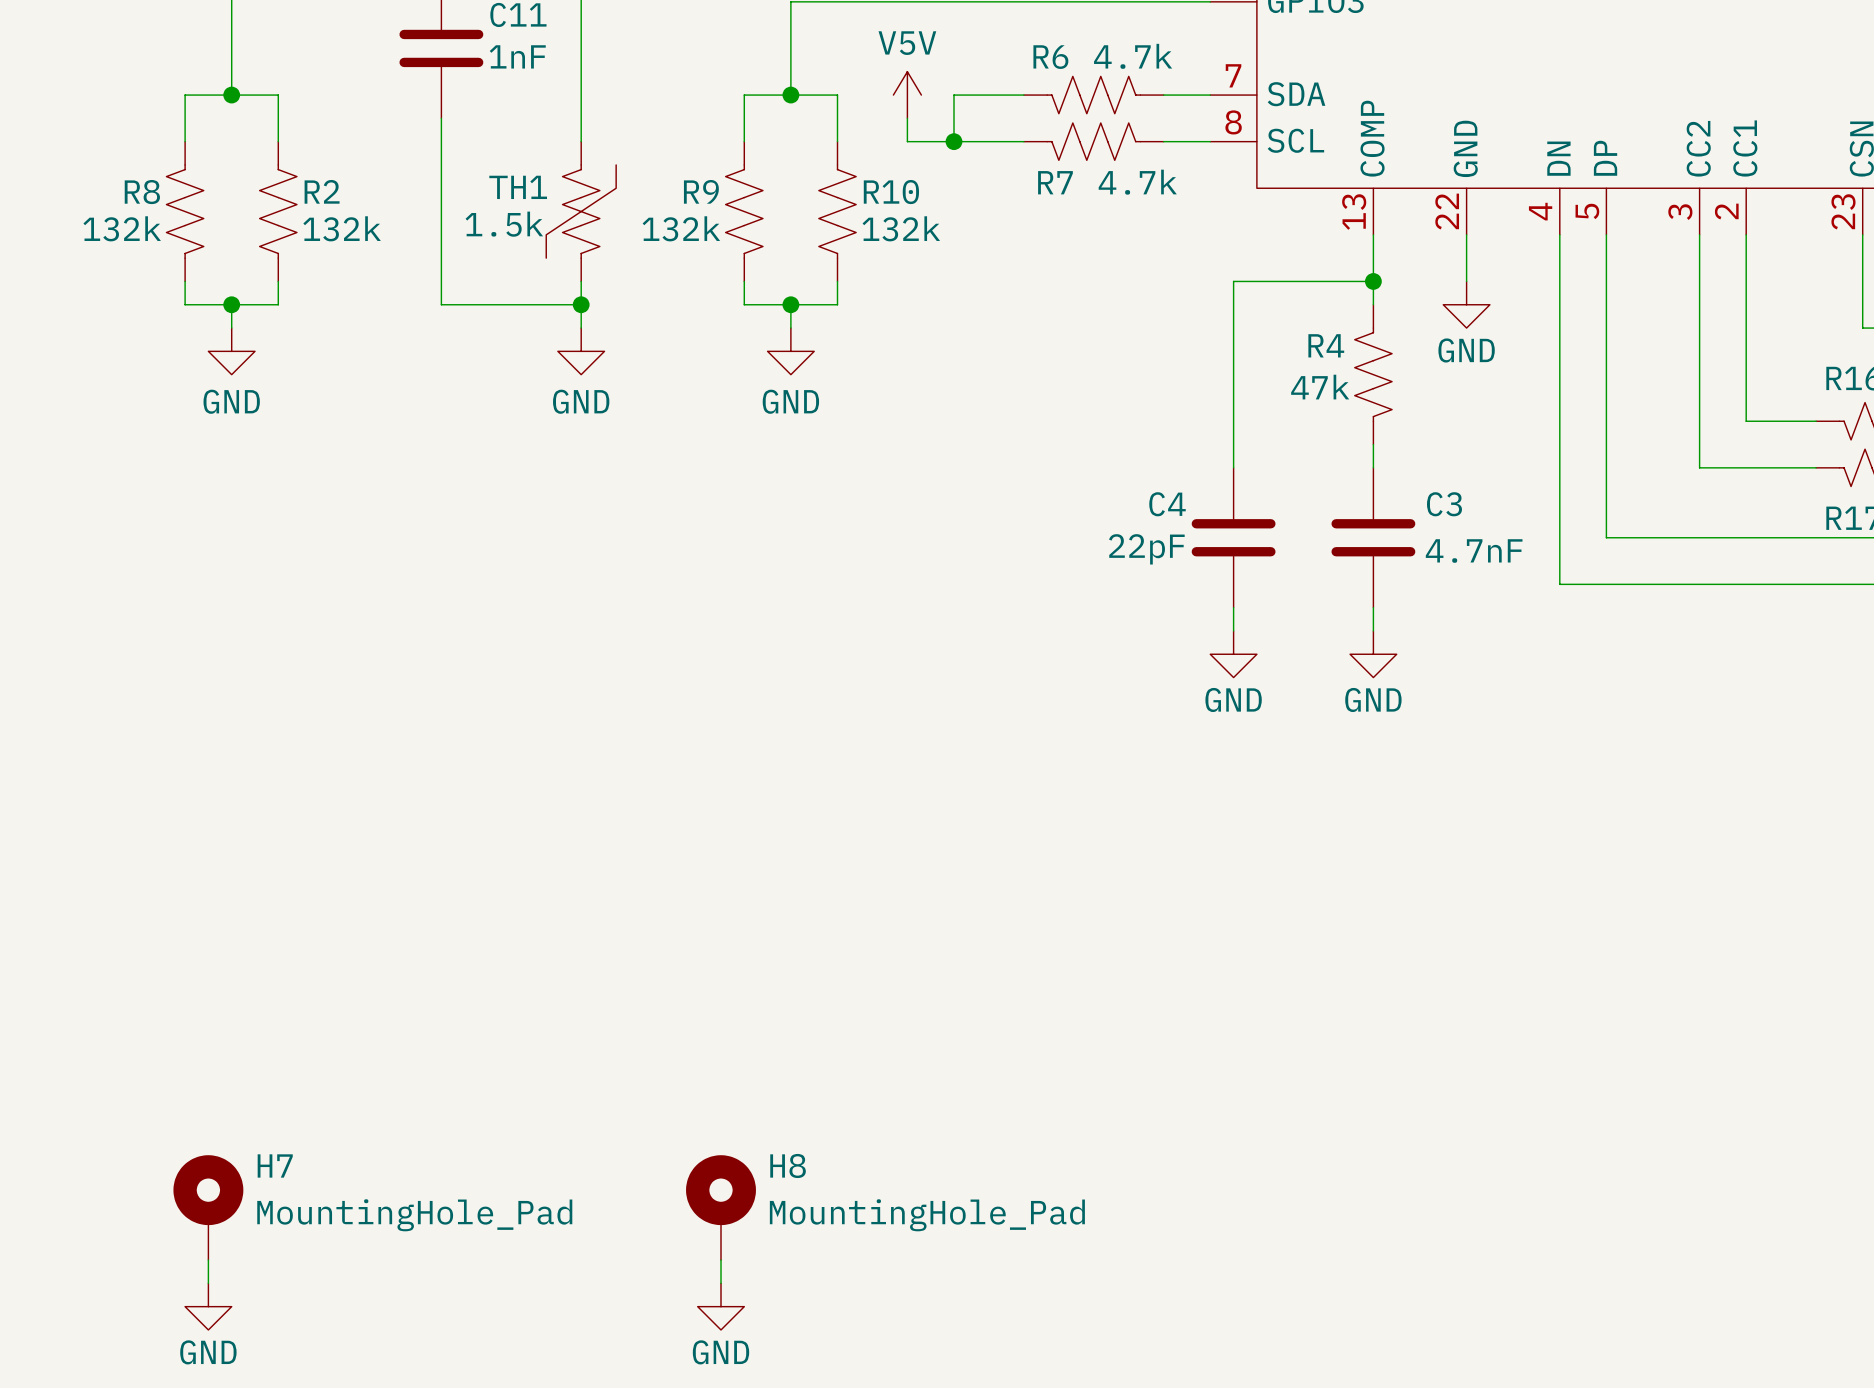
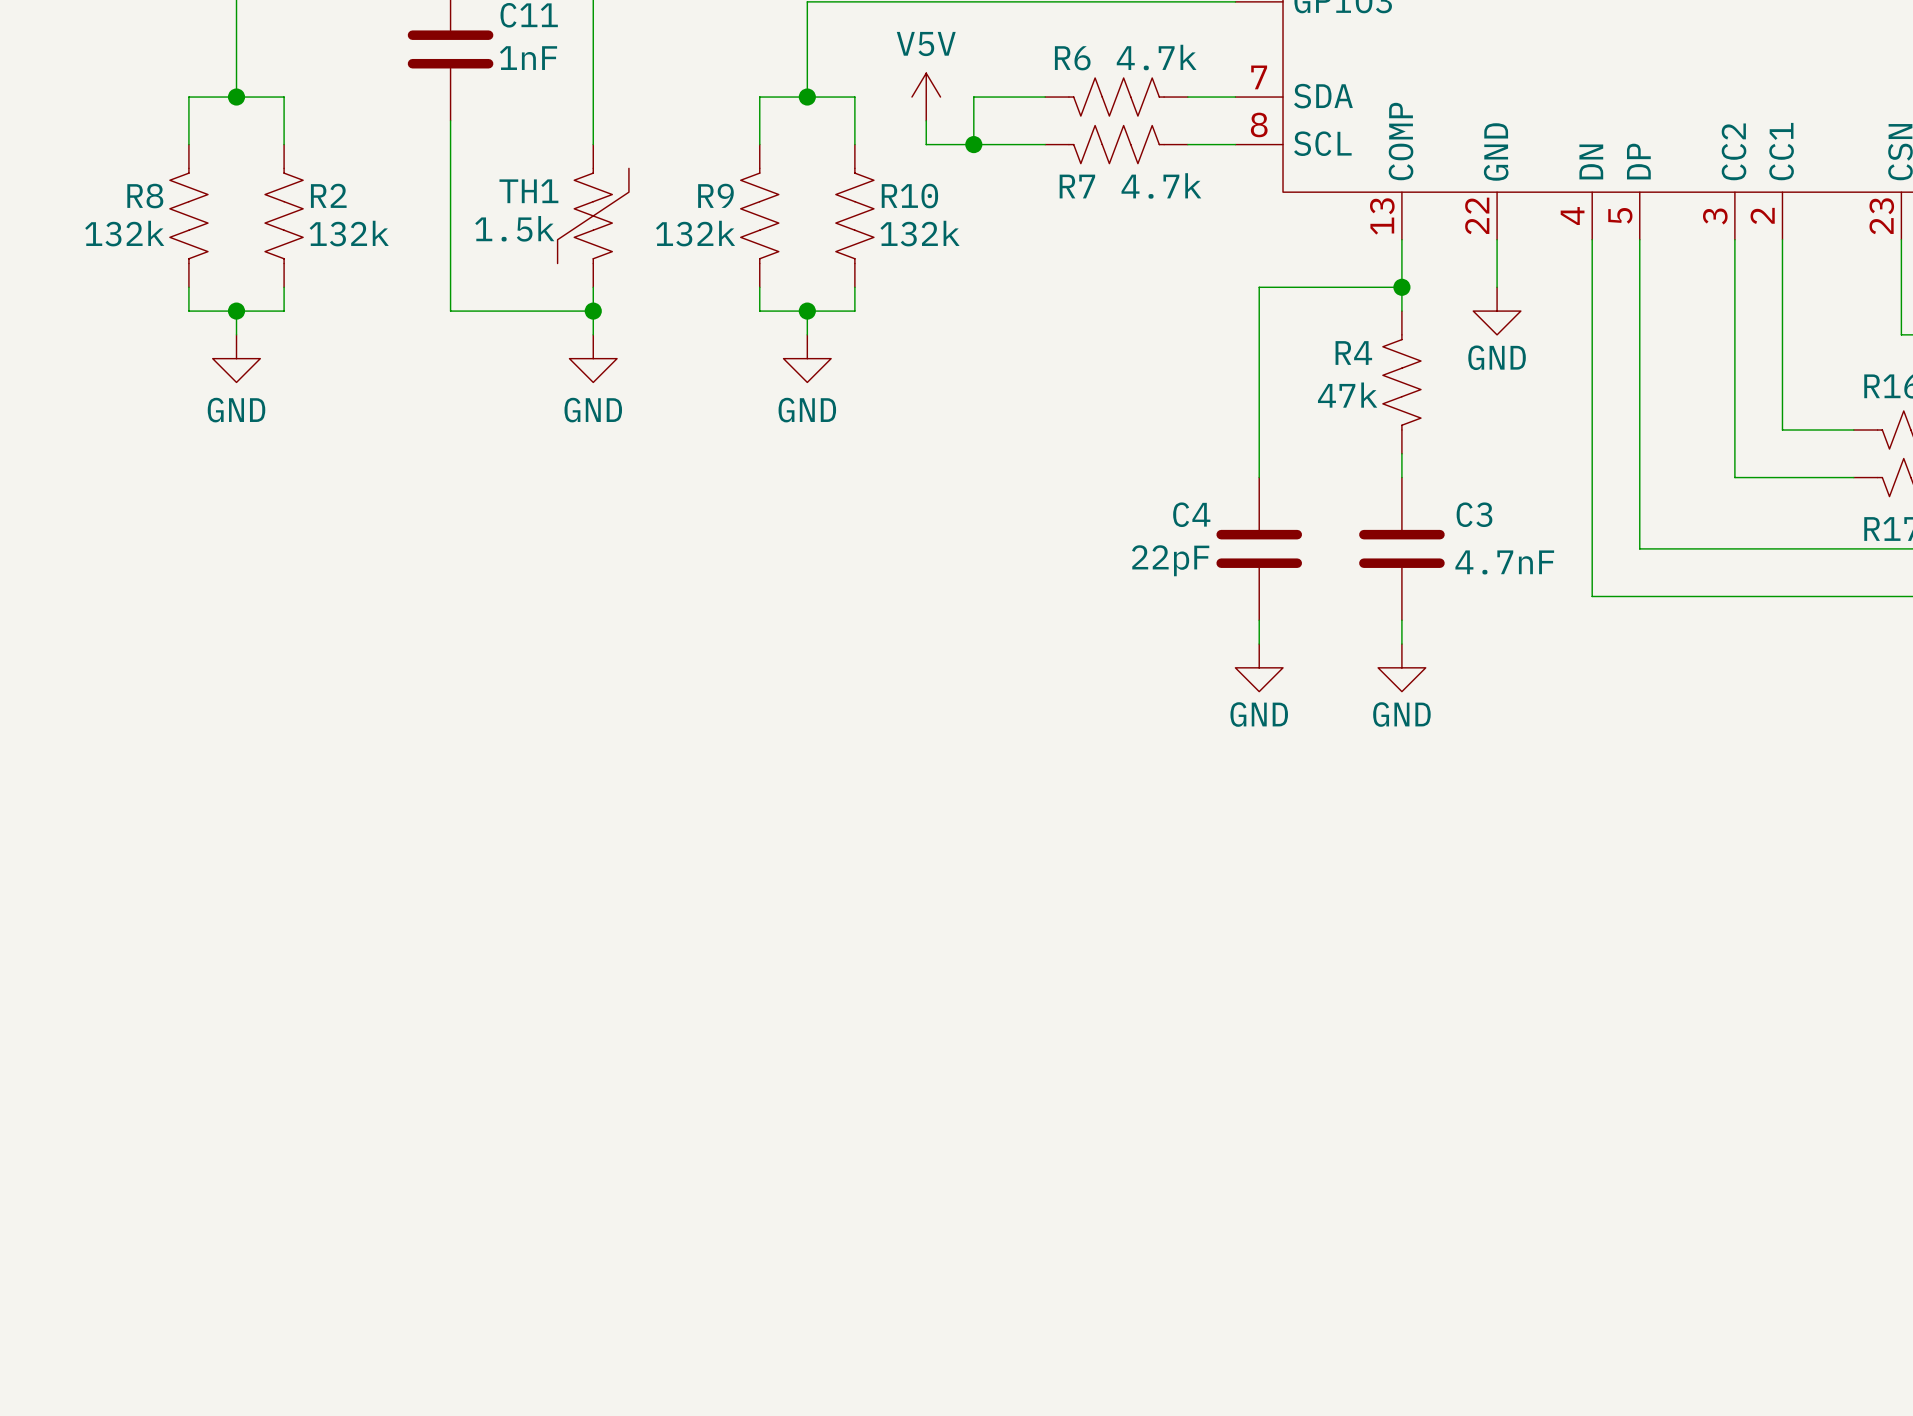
H7: MountingHole_Pad (208, 1207) -> none
H8: MountingHole_Pad (721, 1207) -> none
wire: (208, 1260) (208, 1283) -> none
wire: (721, 1260) (721, 1283) -> none
power symbol: GND (208, 1306) -> none
power symbol: GND (721, 1306) -> none

